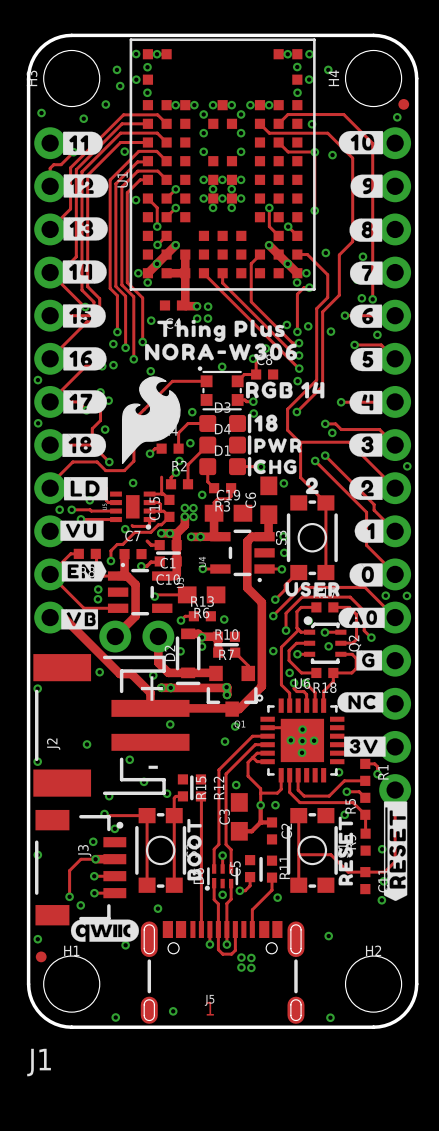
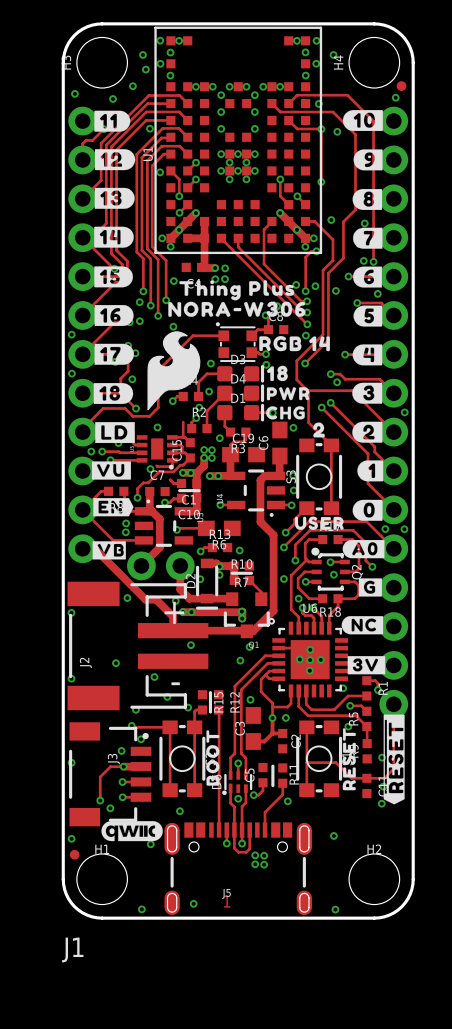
via: (222, 366) -> none

